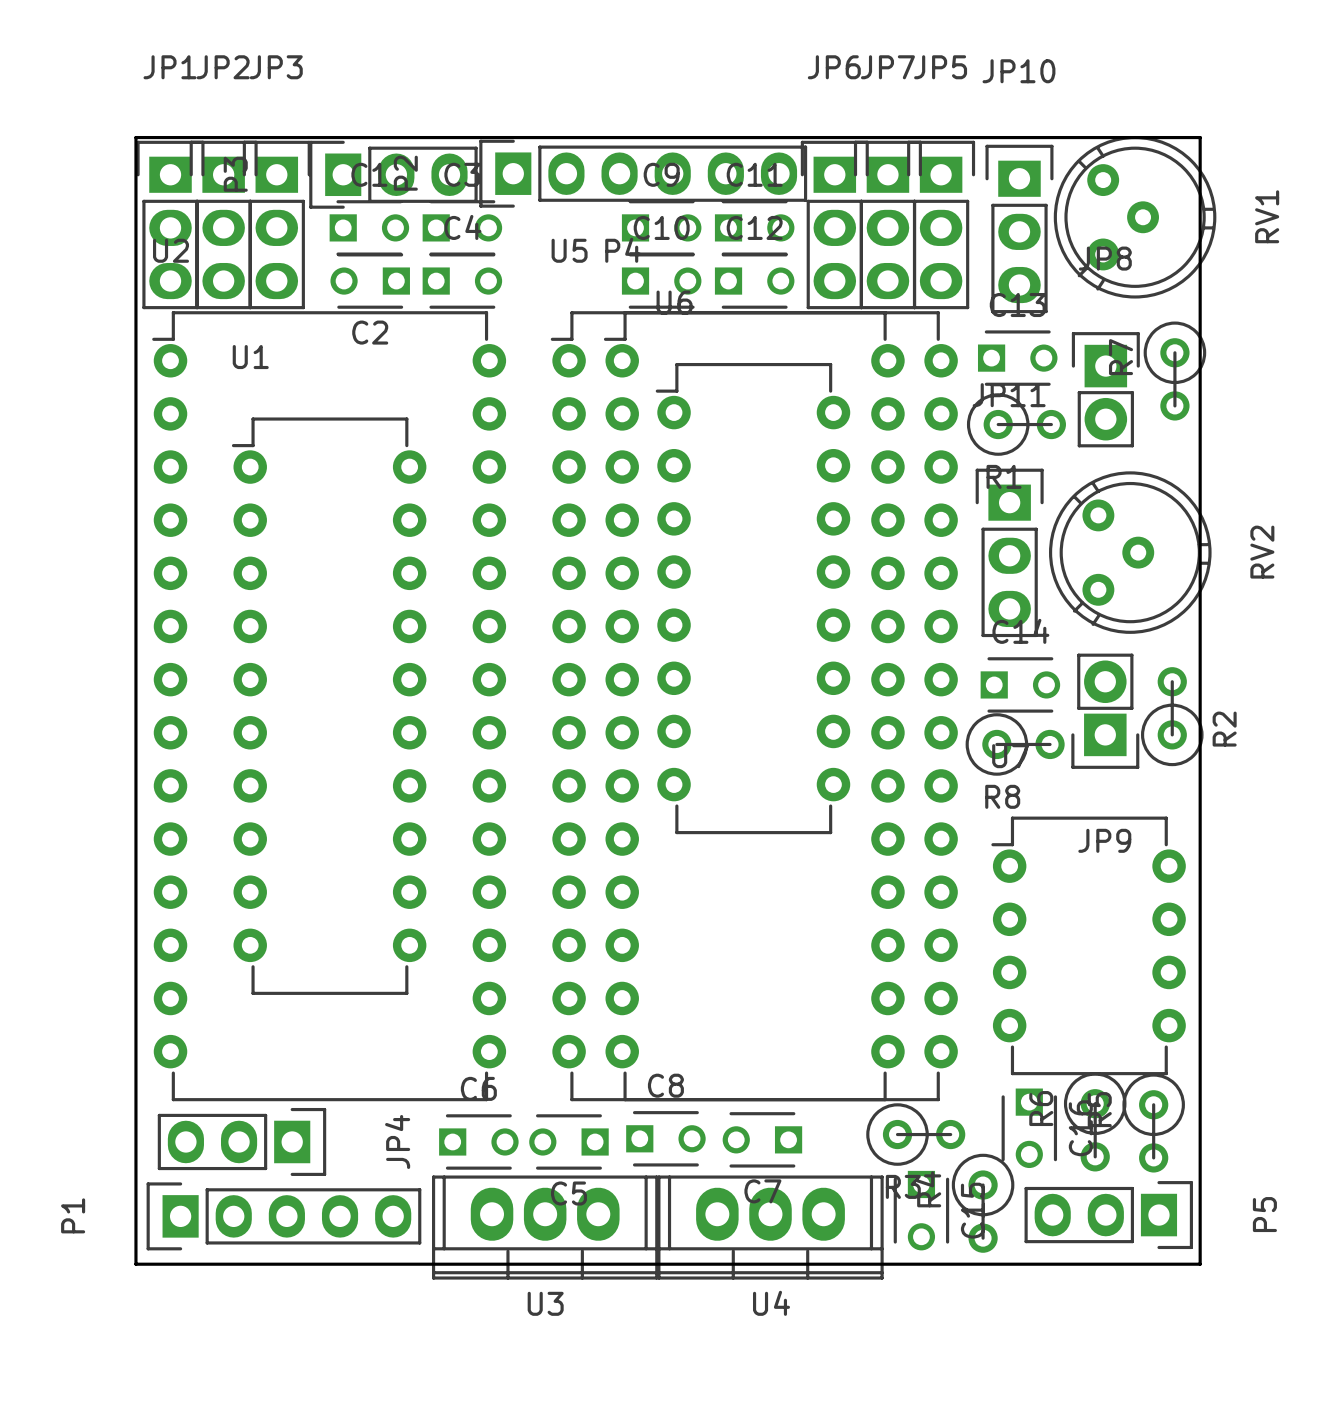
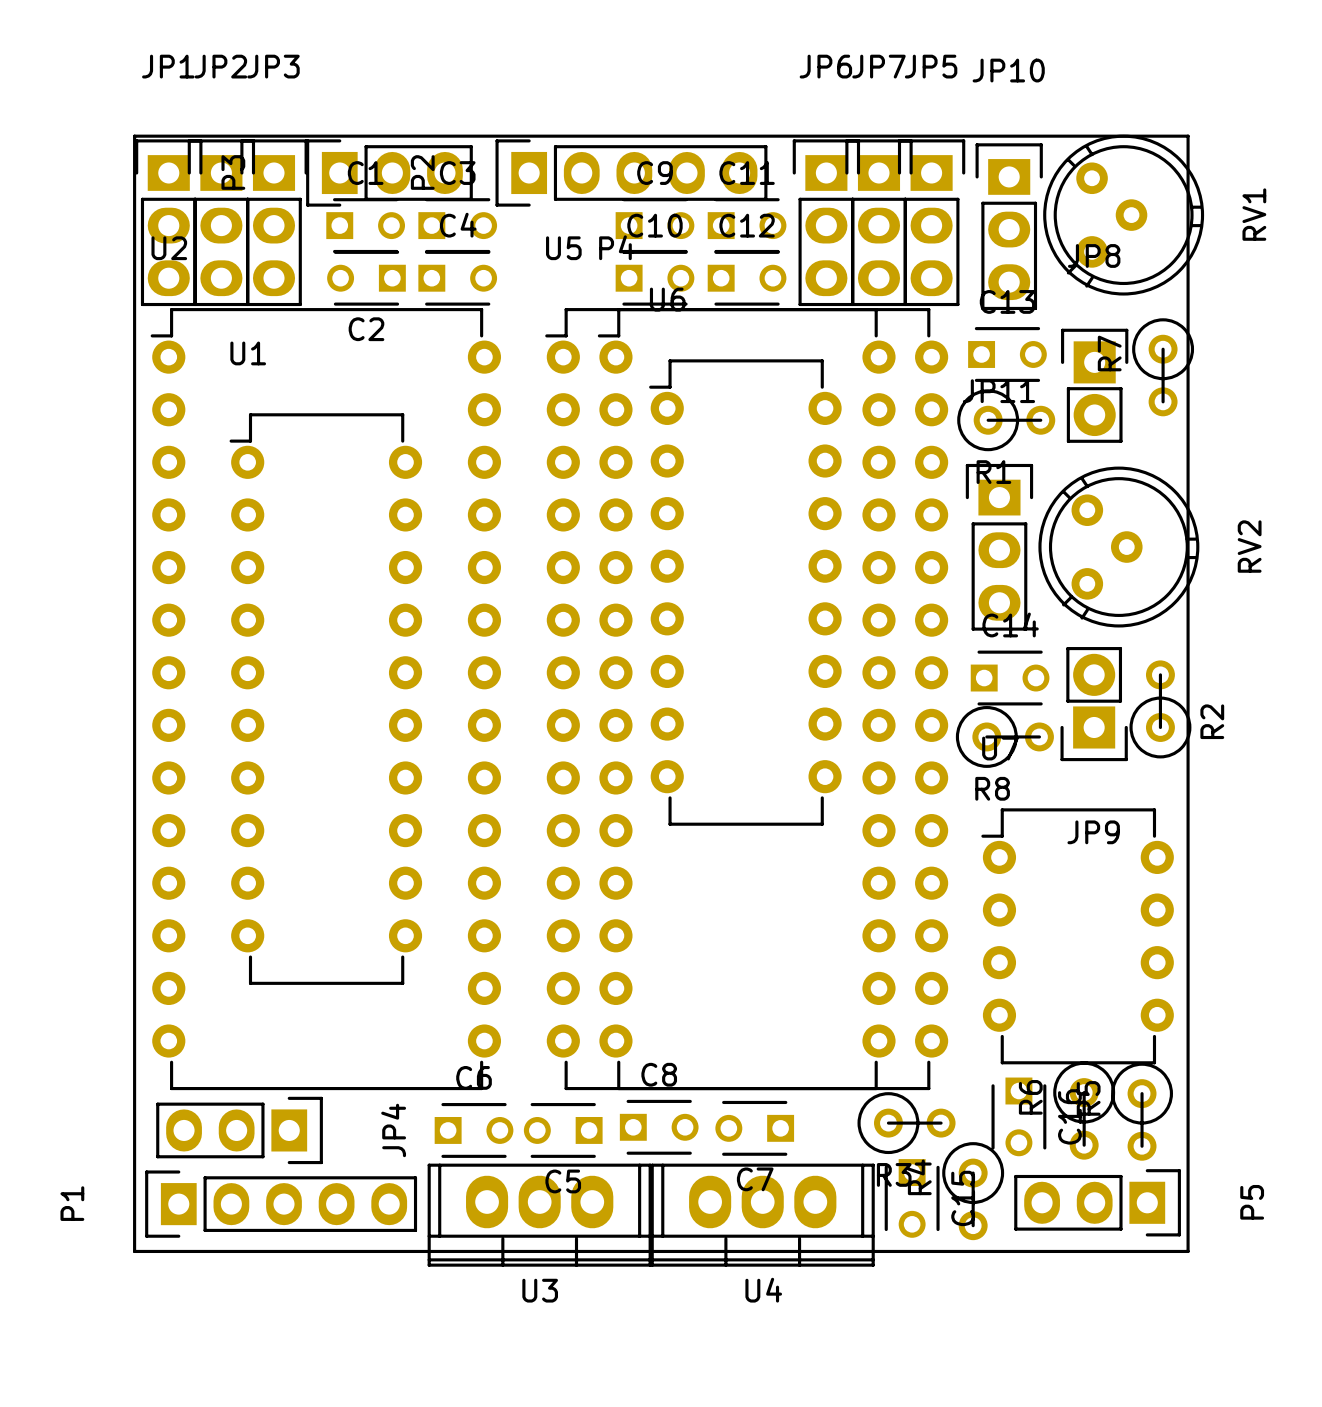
P2 footprint: [479, 139, 808, 208] -> [495, 139, 768, 207]

